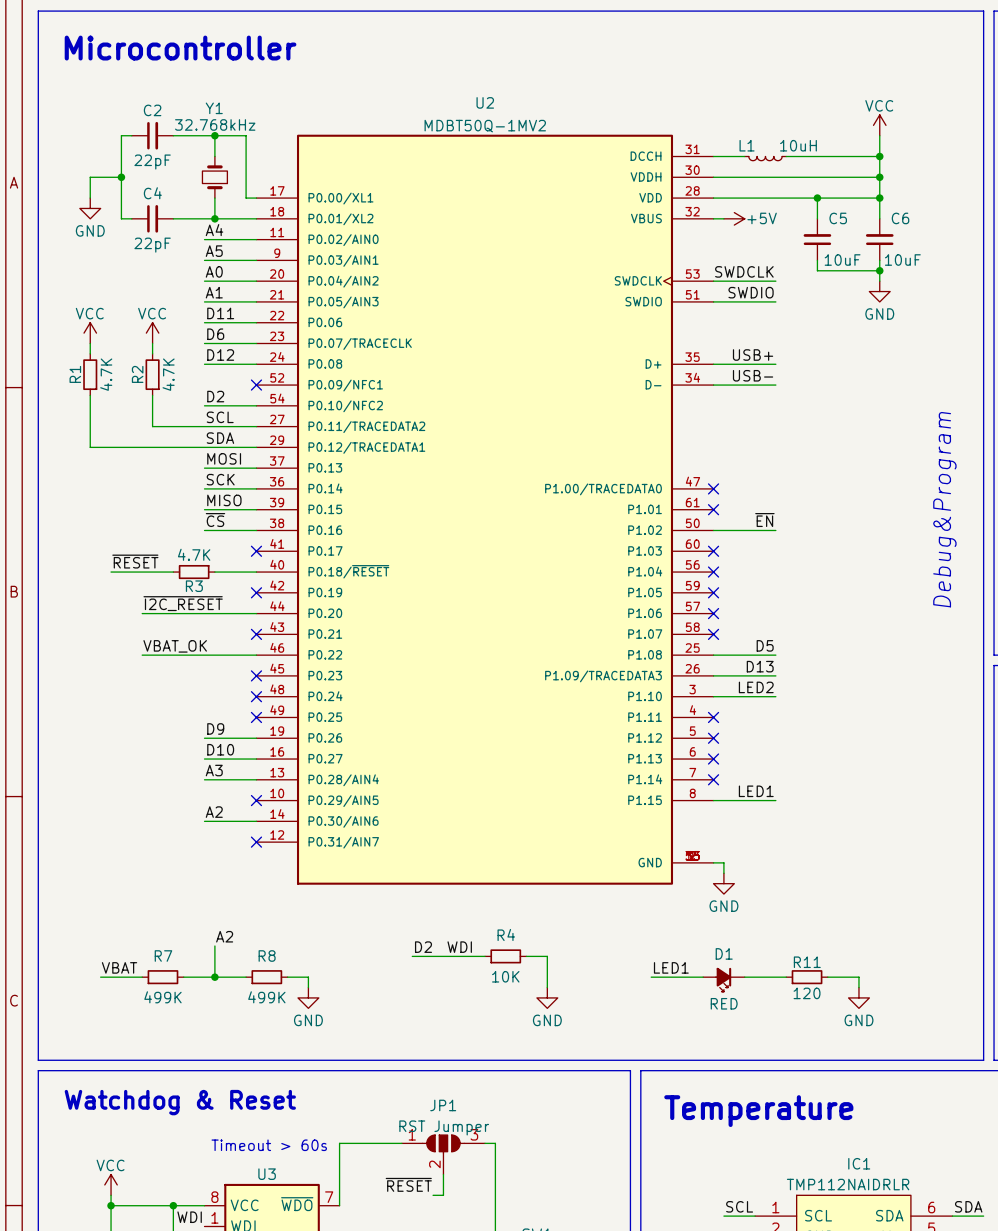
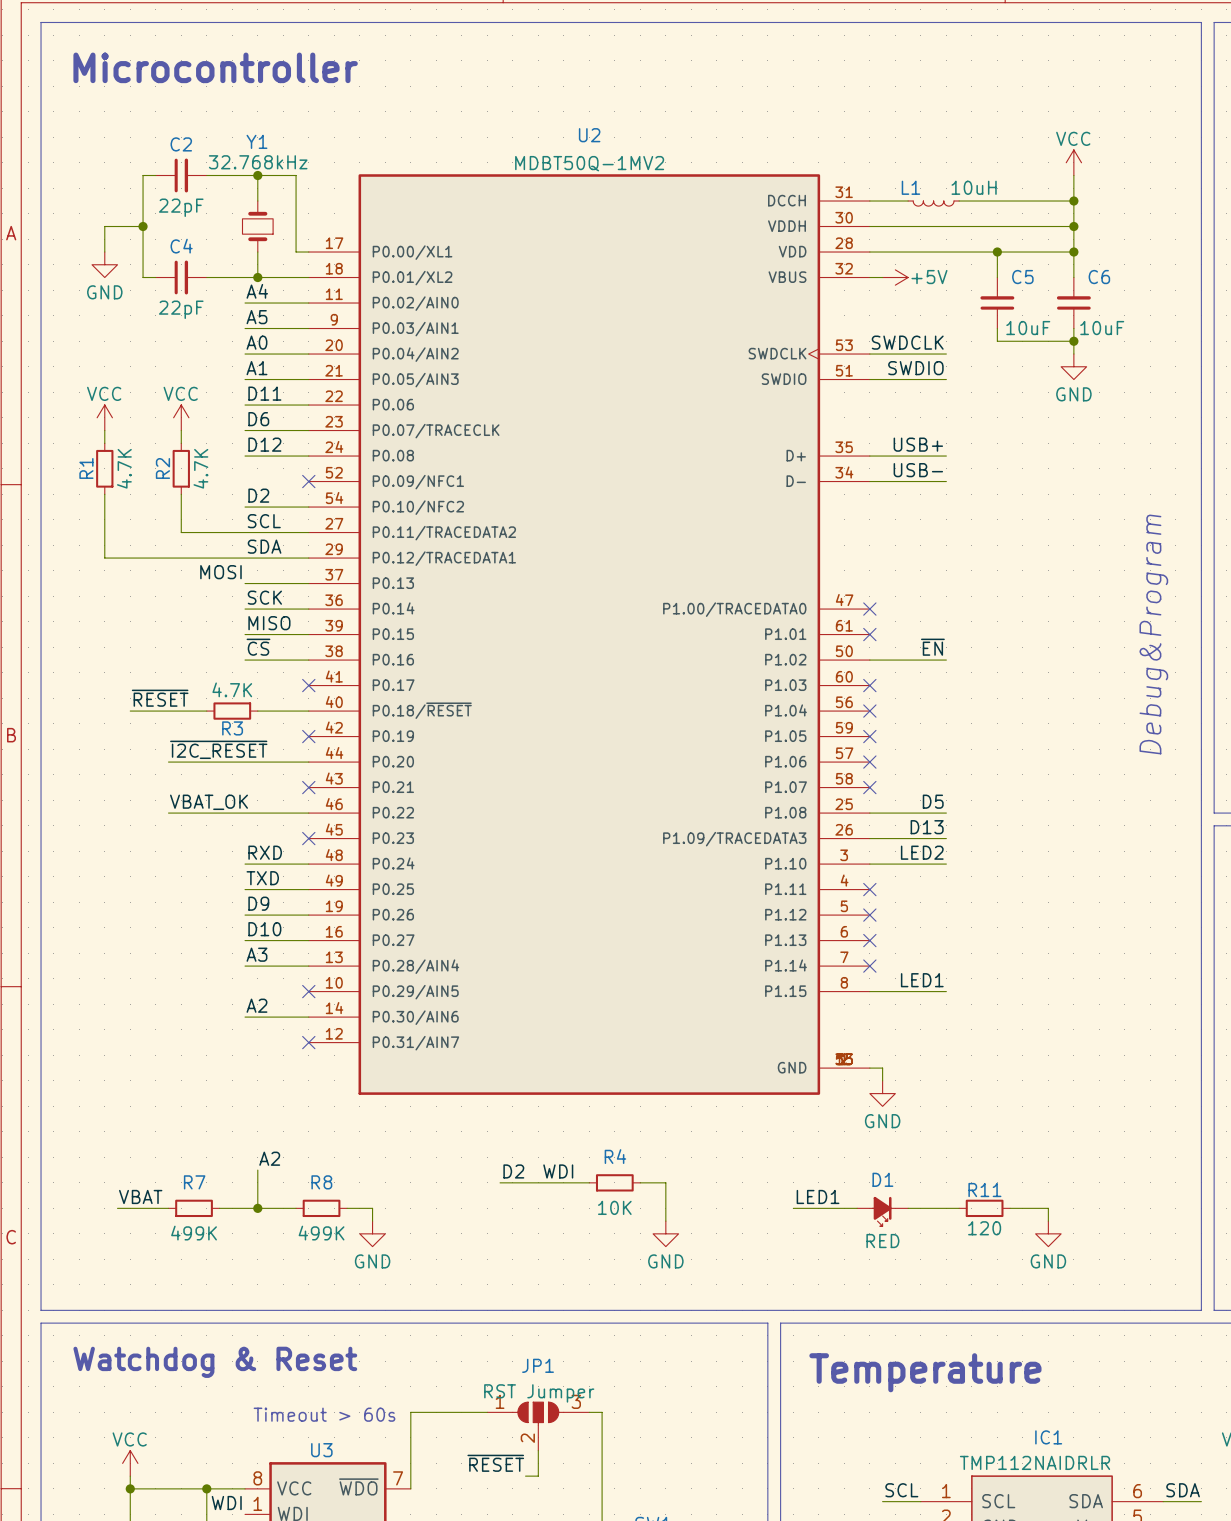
label position: MOSI (224, 458) -> MOSI (220, 572)
label: none -> RXD (265, 852)
wire: none -> (245, 864) (308, 864)
no-connect mark: (256, 696) -> none
label: none -> TXD (262, 878)
wire: none -> (245, 889) (308, 889)
no-connect mark: (256, 717) -> none

